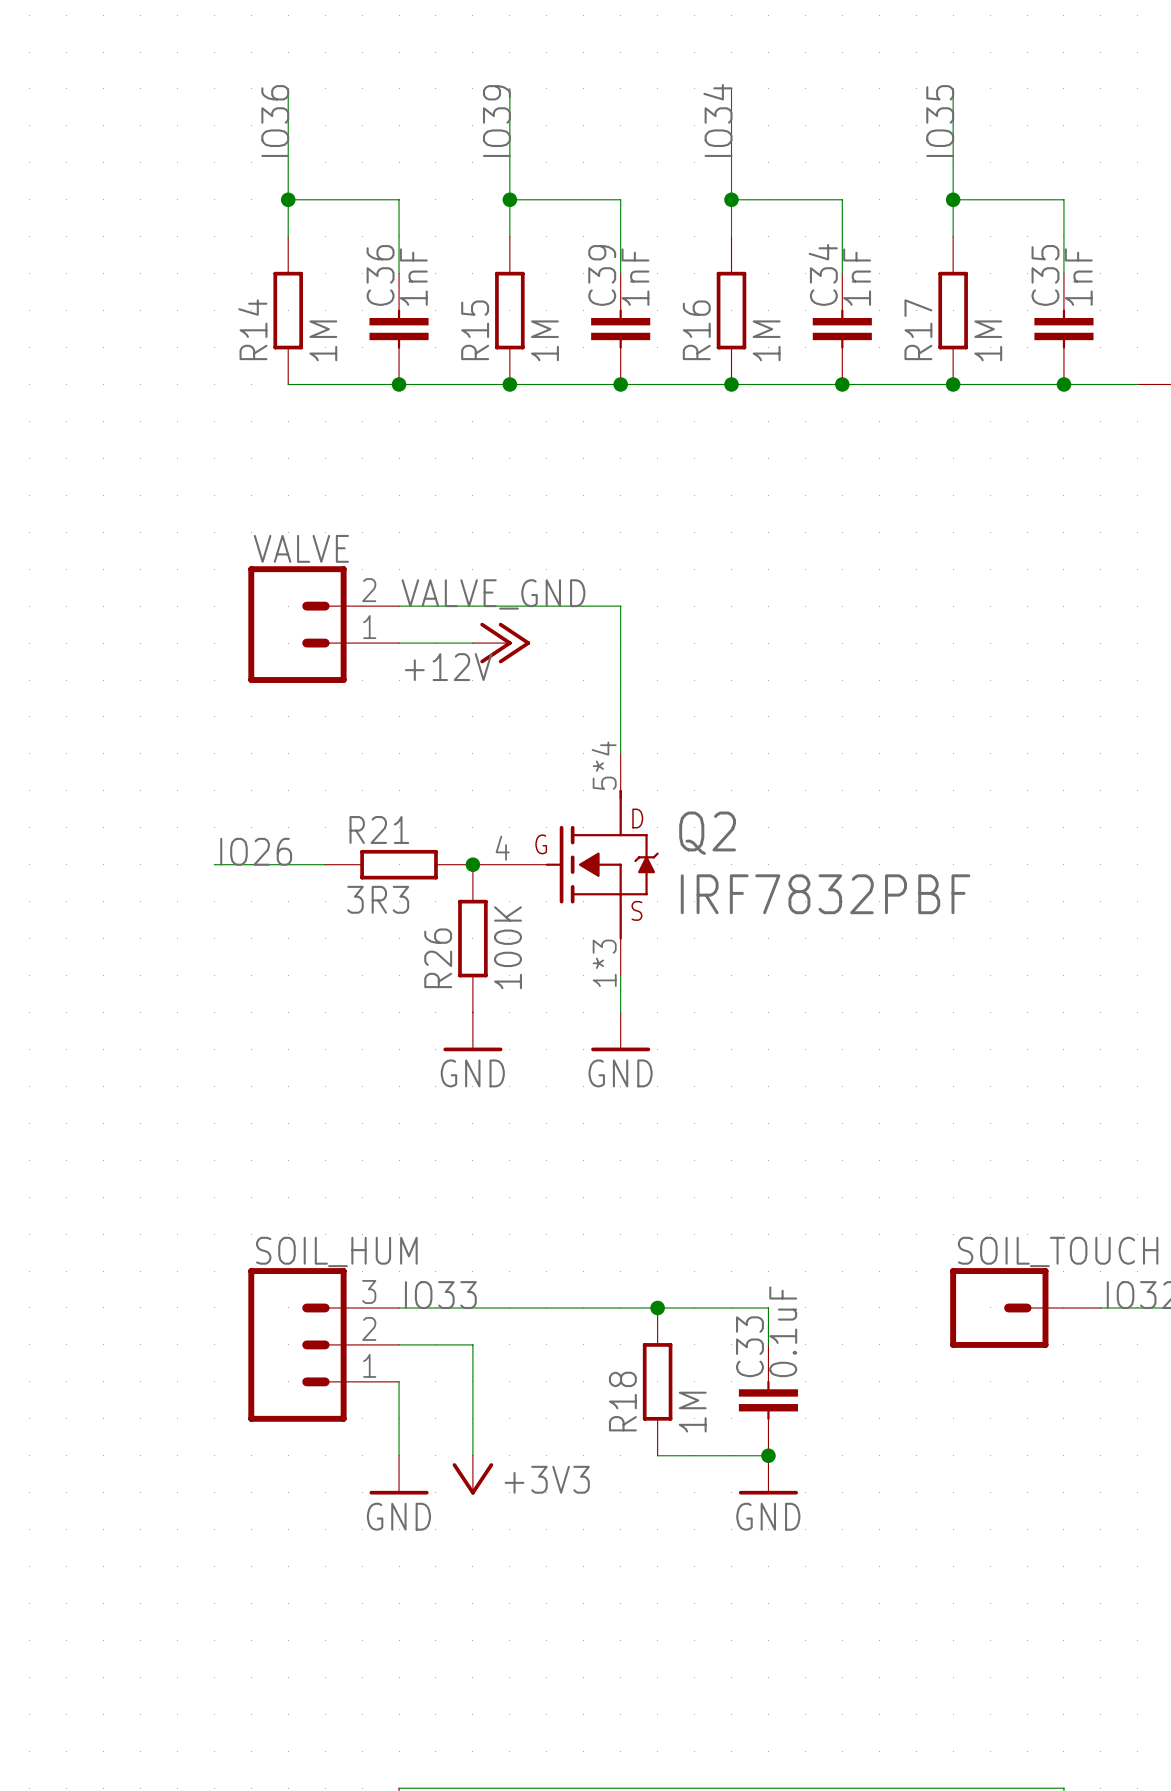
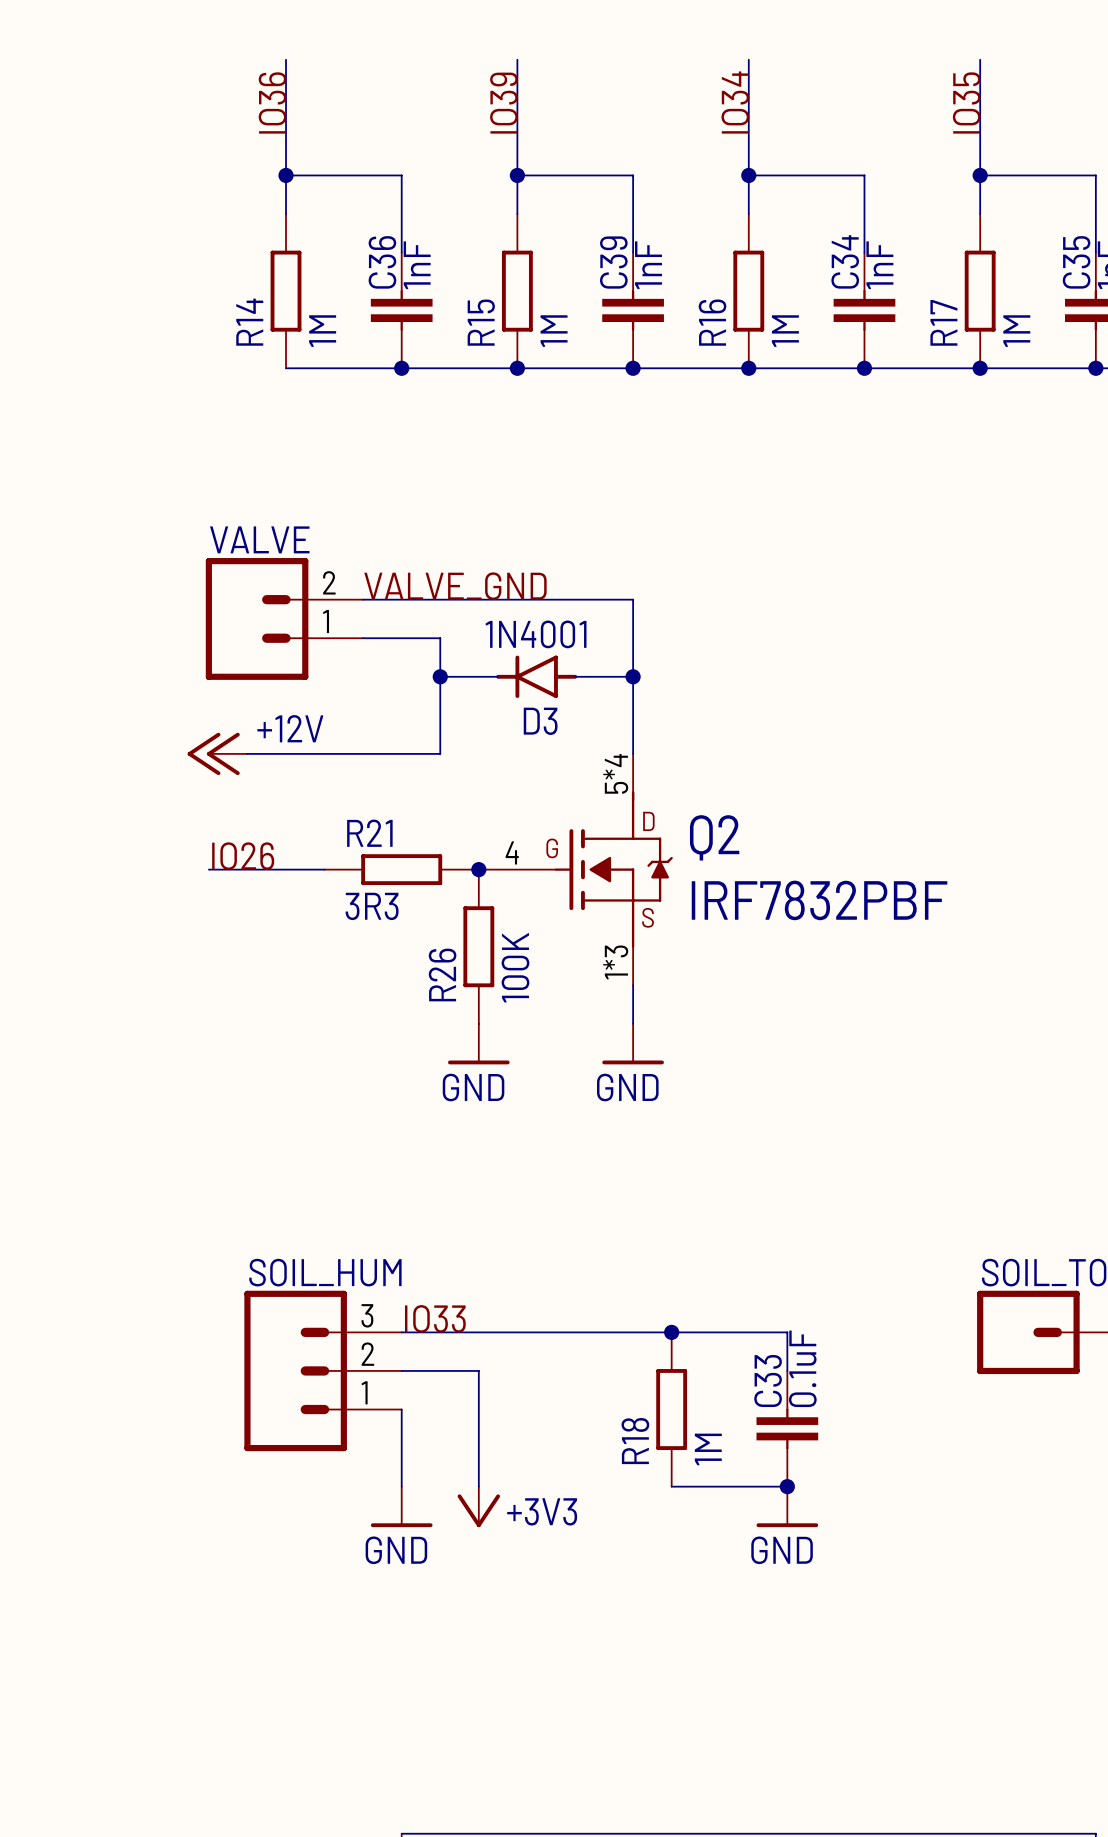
label position: VALVE_GND (493, 594) -> VALVE_GND (455, 586)
VALVE position: (323, 624) -> (284, 618)
wire: (435, 643) (472, 643) -> (440, 638) (440, 753) (247, 753)
power symbol position: +12V (501, 643) -> +12V (217, 753)
power symbol rotation: 0° (505, 643) -> 180° (213, 753)
wire: none -> (440, 676) (498, 676)
junction: none -> (440, 676)
D3: none -> 1N4001 (536, 676)
wire: none -> (575, 676) (633, 676)
junction: none -> (633, 676)

